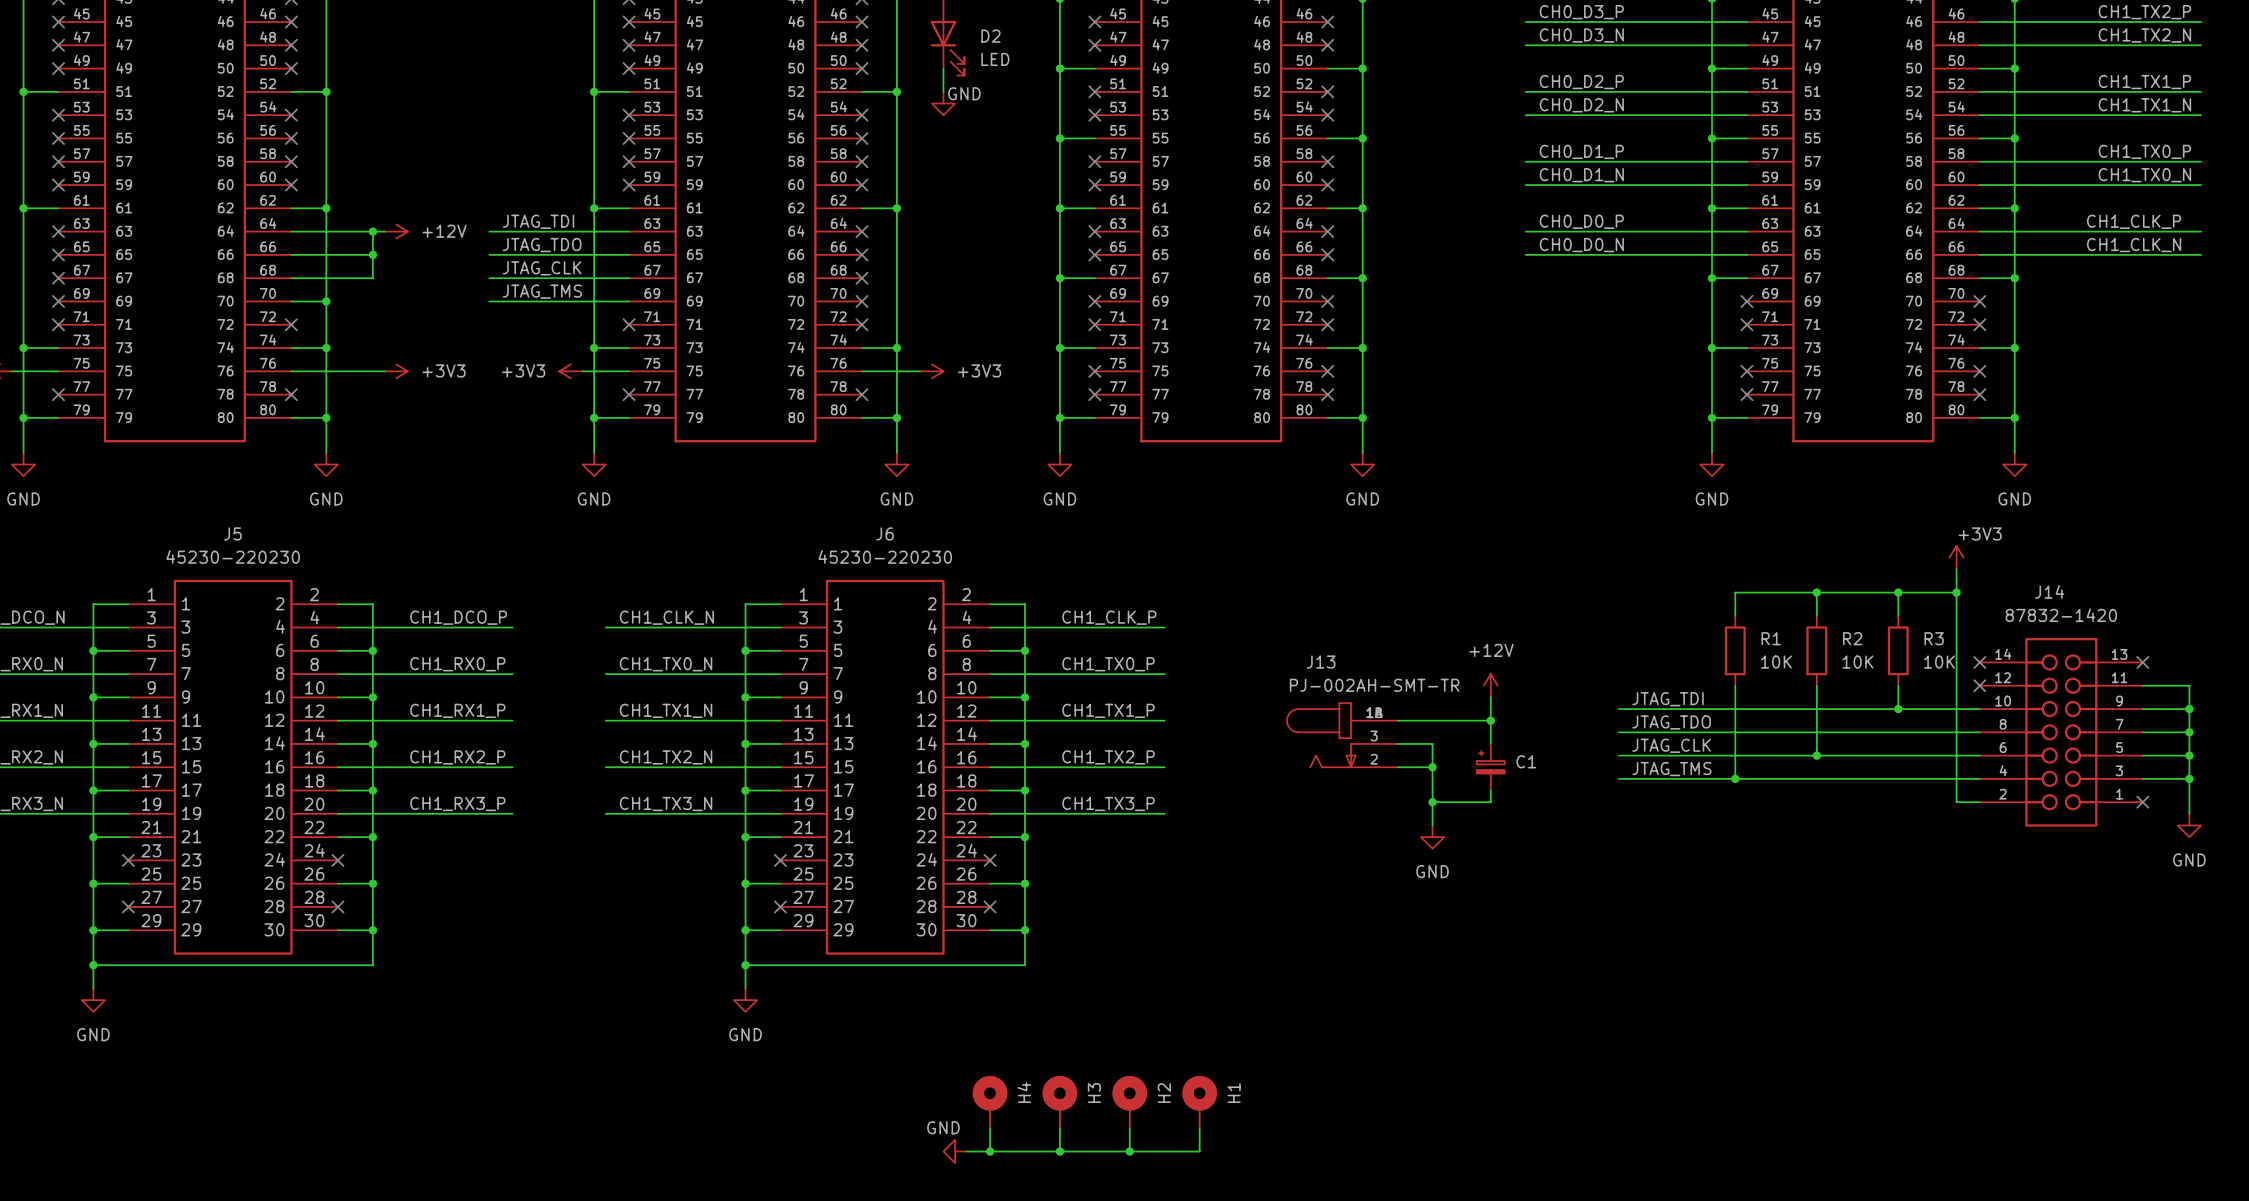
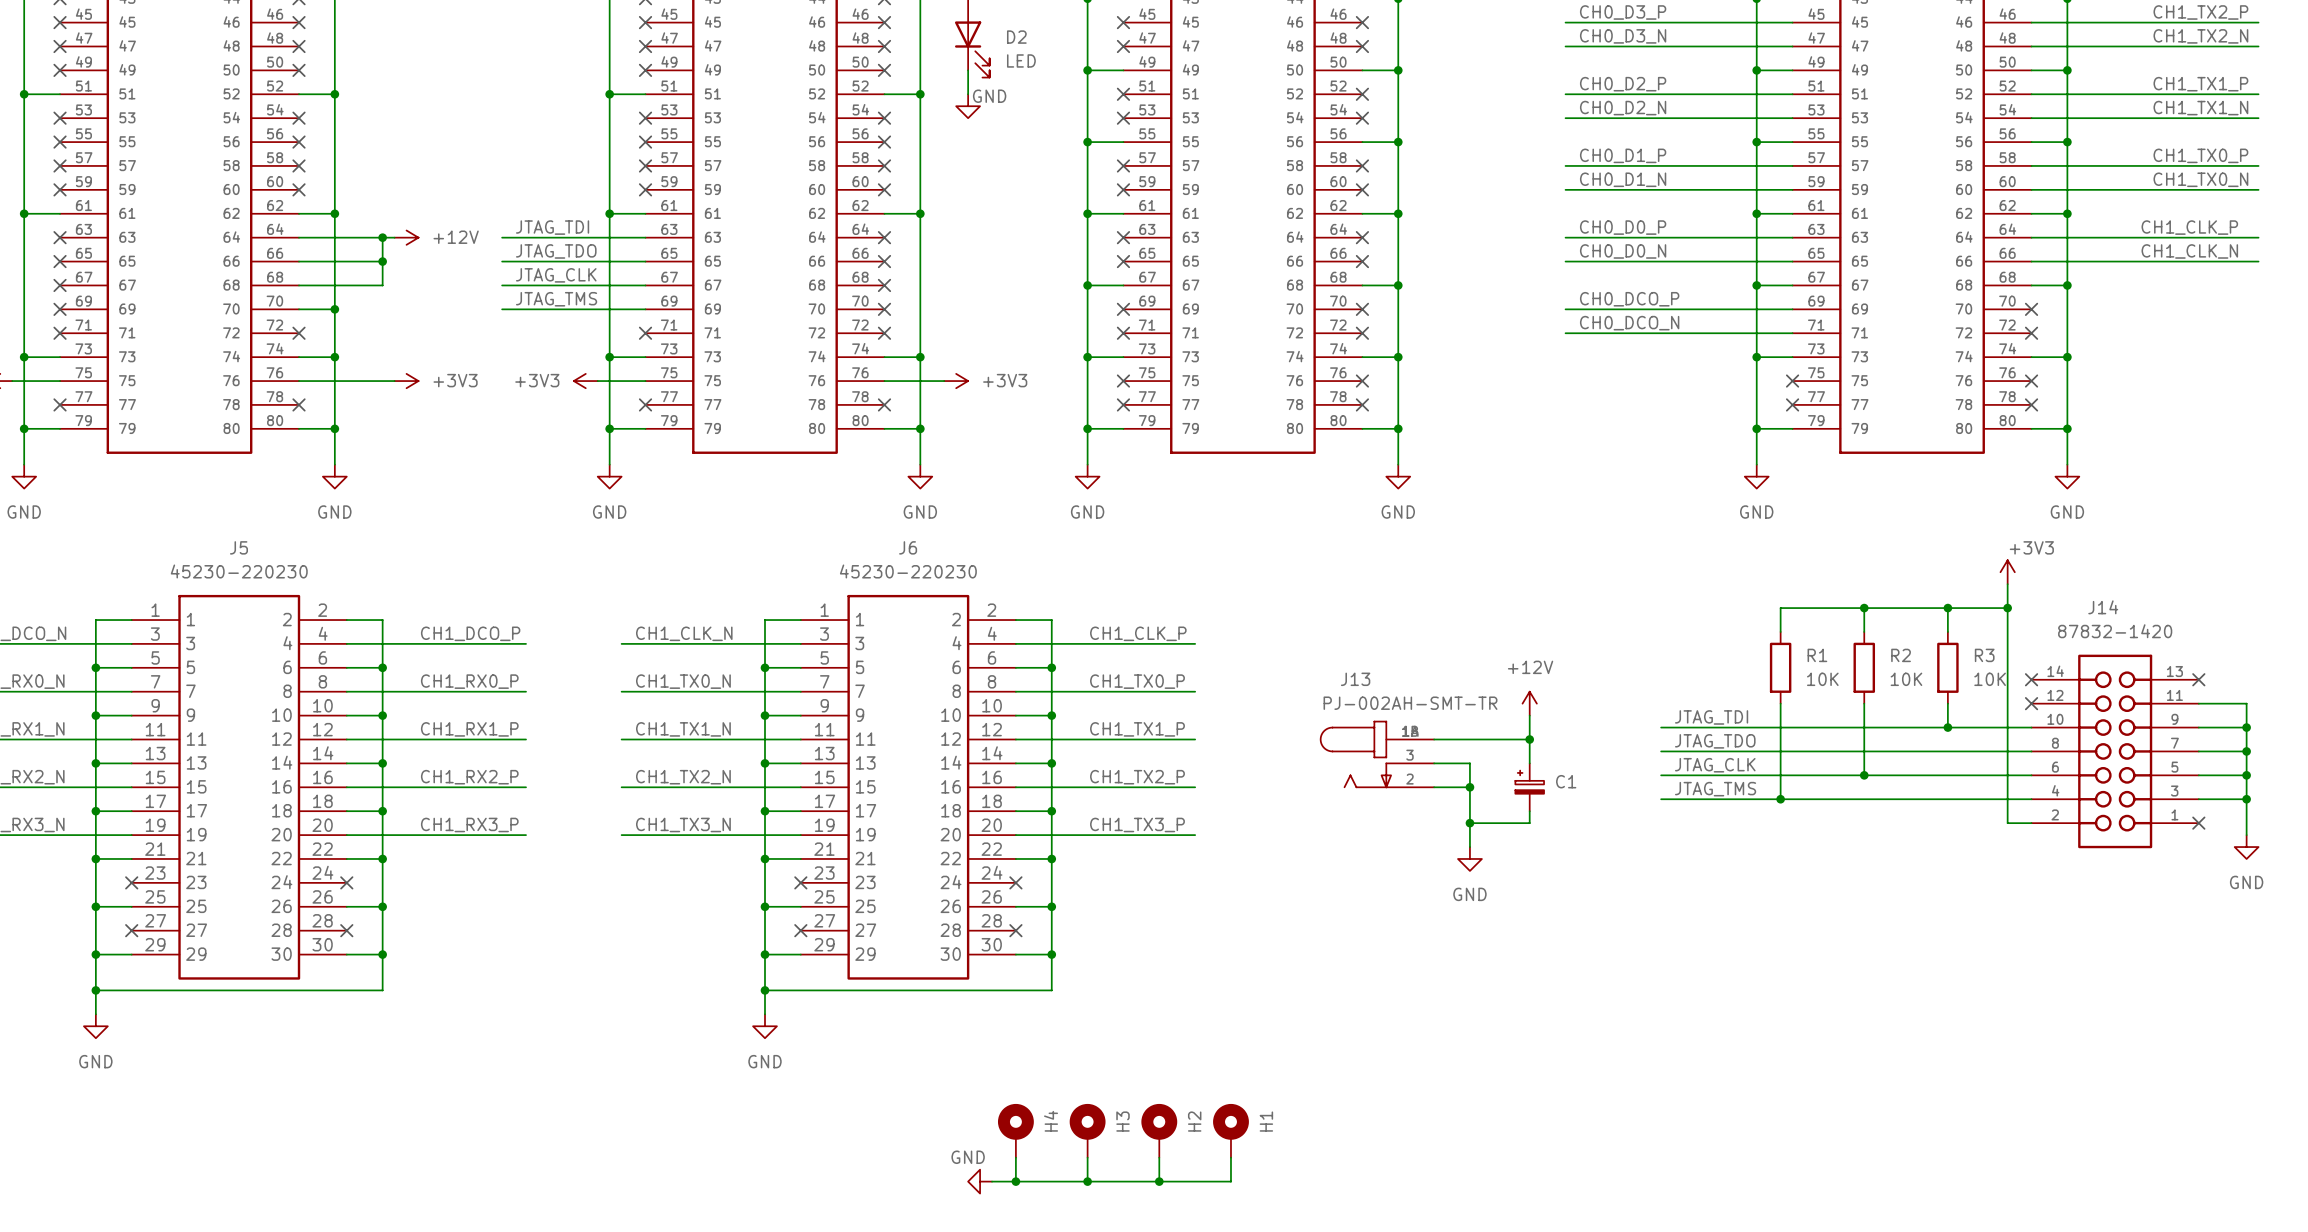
label: none -> CH0_DCO_P (1629, 299)
wire: none -> (1565, 309) (1792, 309)
no-connect mark: (1746, 301) -> none
label: none -> CH0_DCO_N (1629, 323)
wire: none -> (1565, 333) (1792, 333)
no-connect mark: (1746, 324) -> none

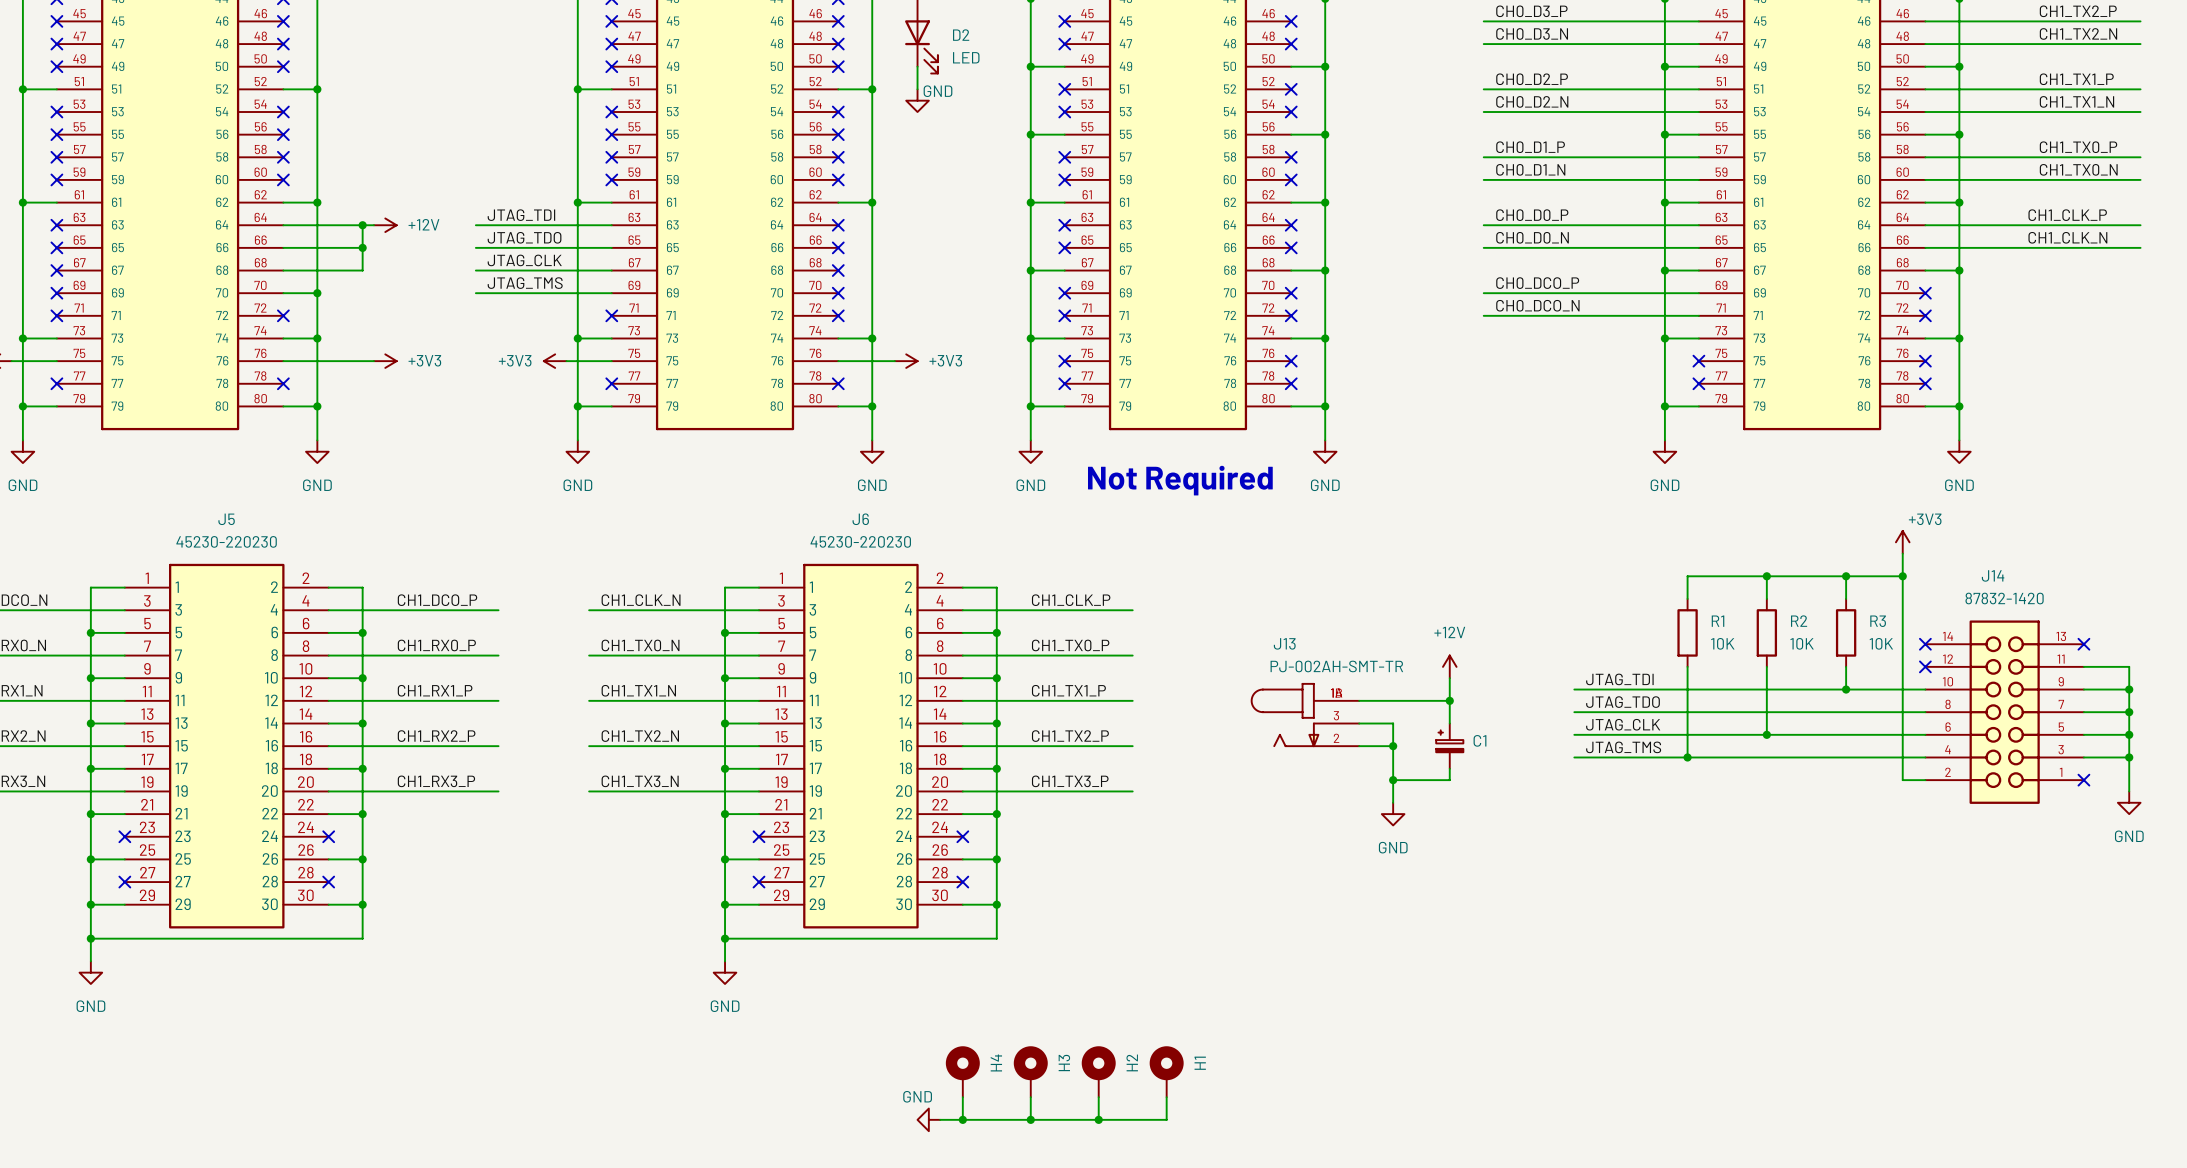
text: none -> Not Required (1180, 480)

